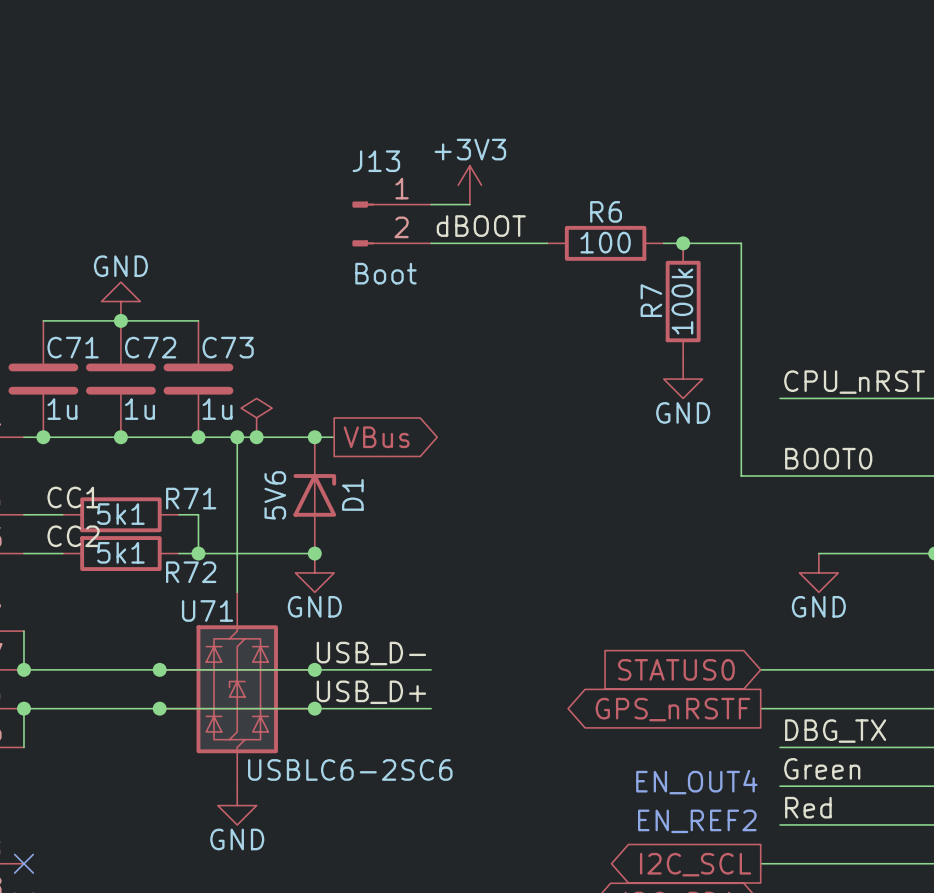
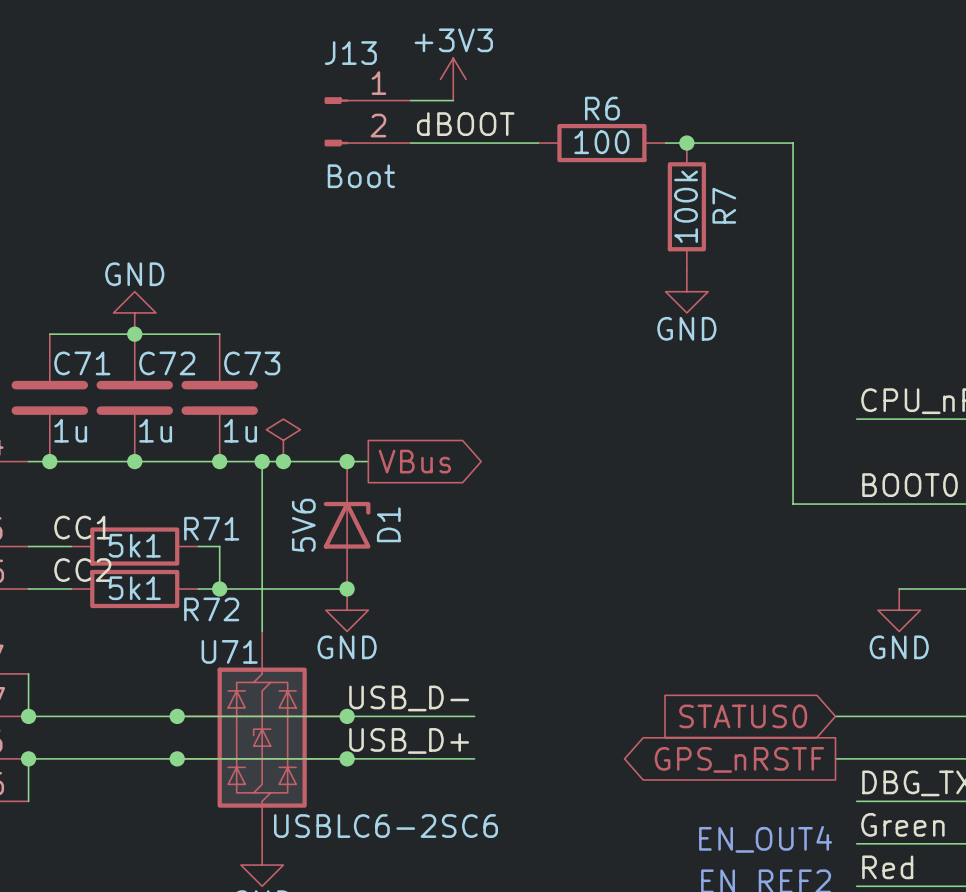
junction: none -> (686, 143)
power symbol position: +3V3 (469, 185) -> +3V3 (453, 79)
wire: (431, 204) (469, 204) -> (410, 100) (453, 100)
J13 position: (391, 223) -> (367, 121)
label position: dBOOT (481, 226) -> dBOOT (465, 124)
wire: (431, 243) (547, 243) -> (410, 143) (538, 143)
R6 position: (605, 243) -> (601, 143)
wire: (663, 243) (741, 243) (741, 476) -> (665, 143) (793, 143) (793, 504) (814, 504)
junction: (683, 243) -> none
R7 name position: R7 (651, 300) -> R7 (724, 205)
R7 position: (683, 301) -> (686, 206)
power symbol position: GND (683, 379) -> GND (686, 291)

